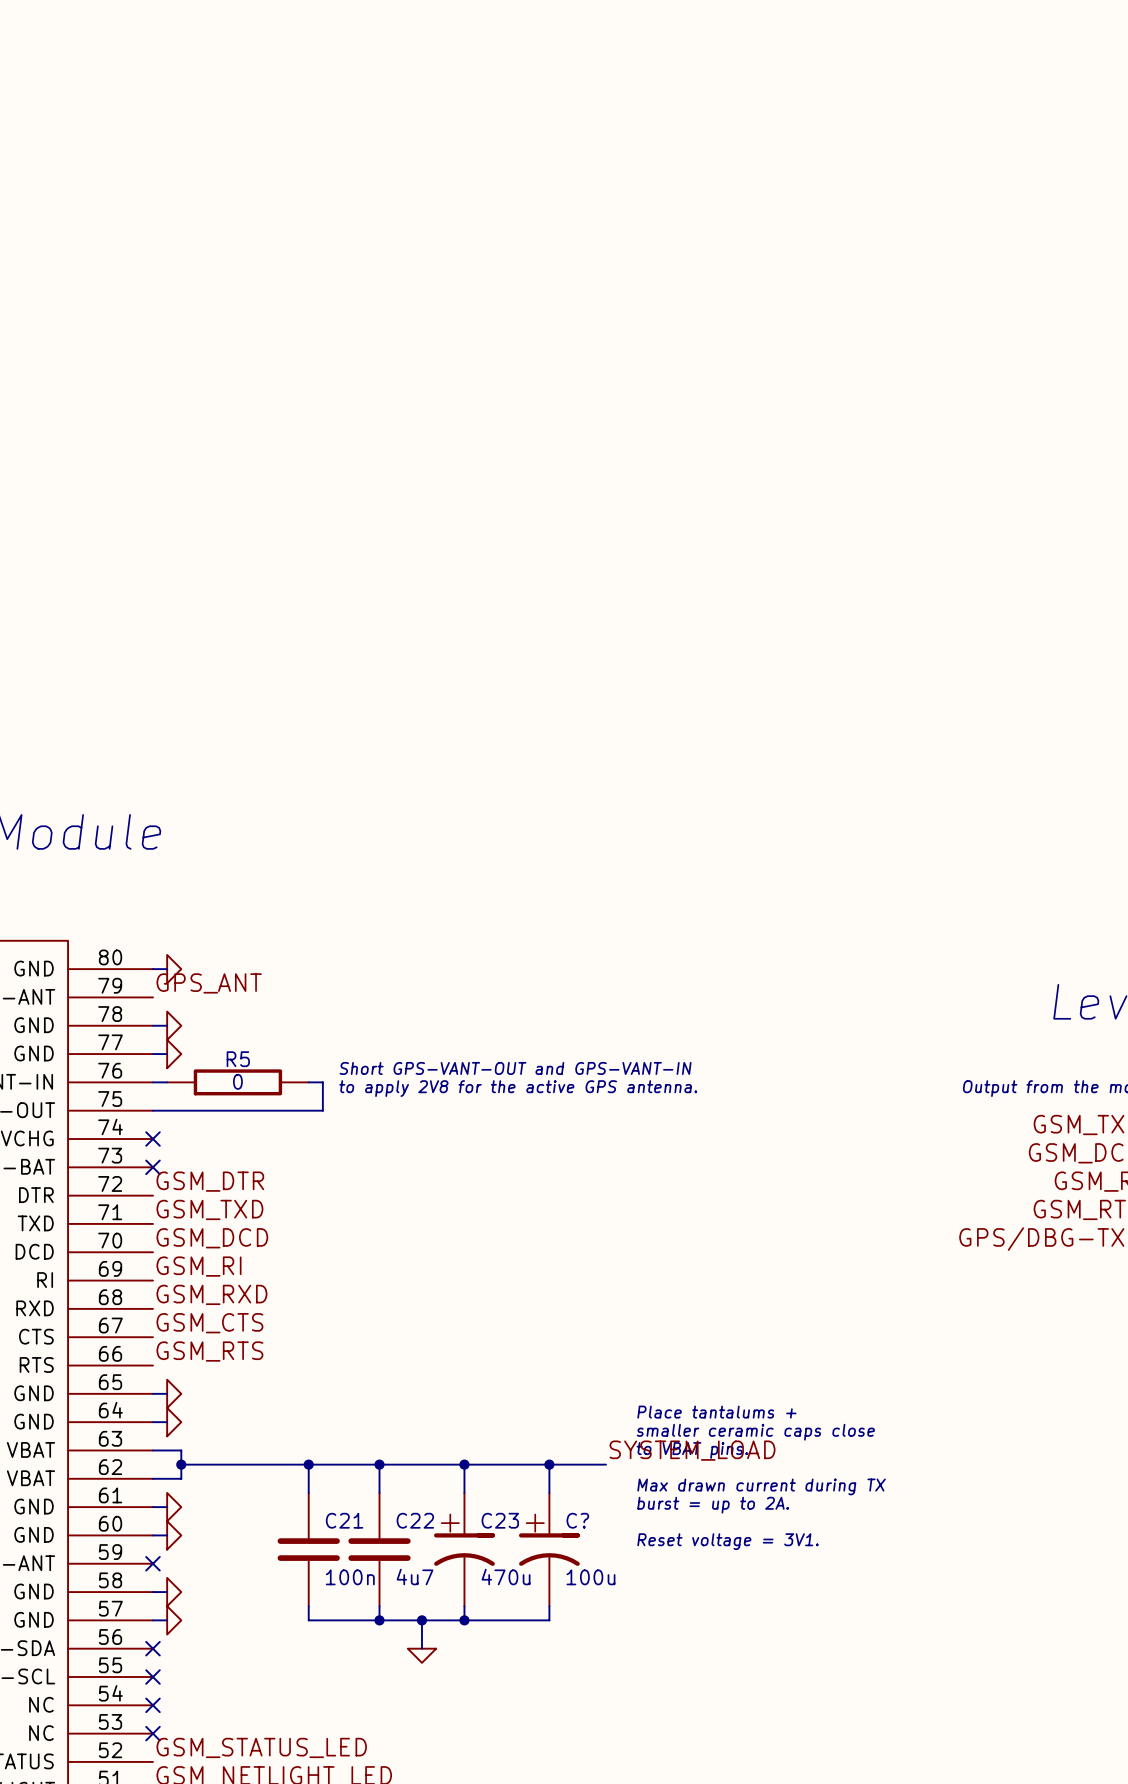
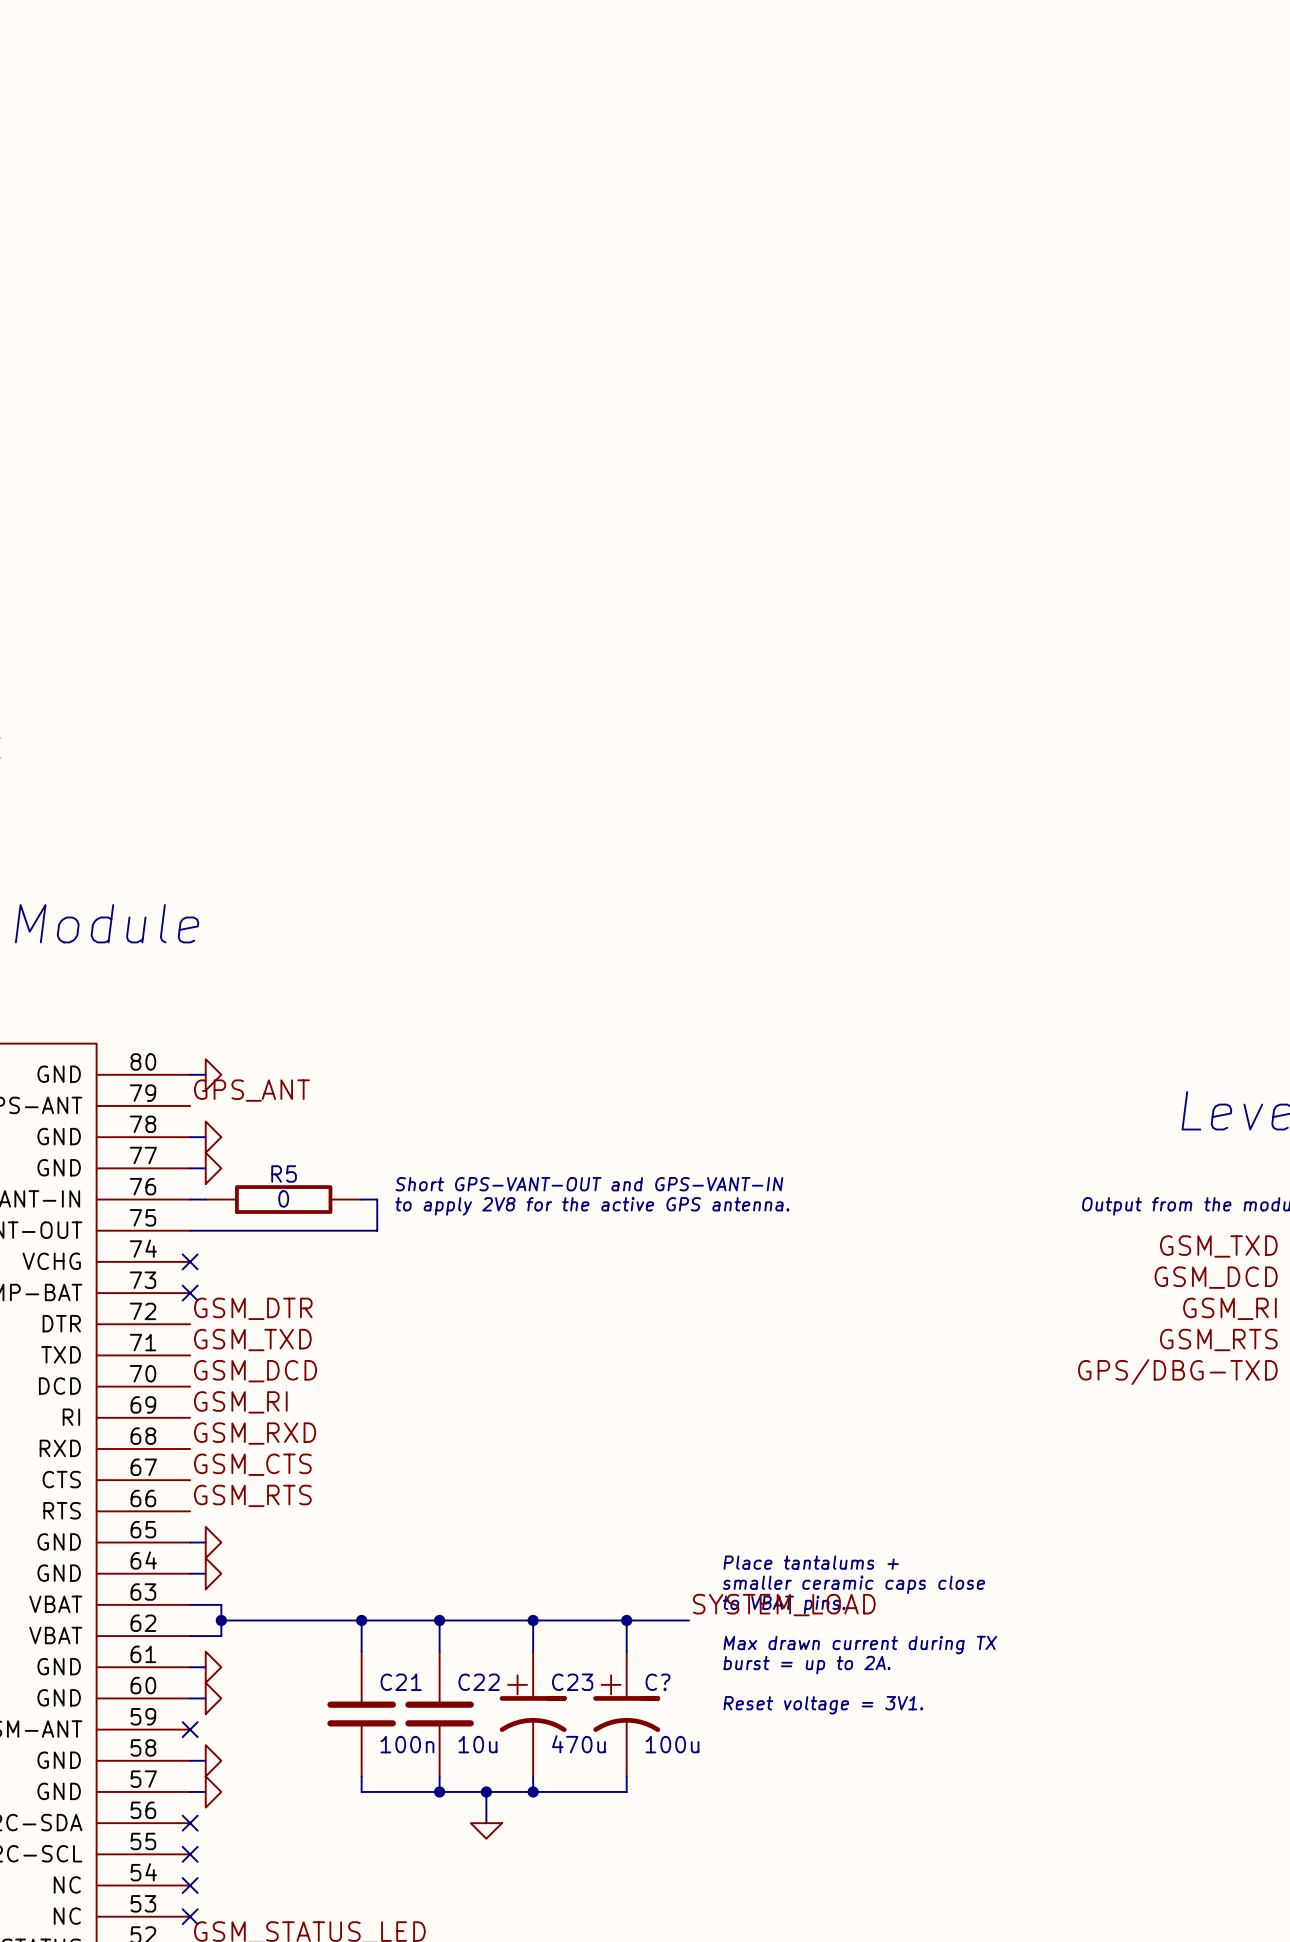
C22 value: 4u7 (415, 1577) -> 10u (477, 1744)

